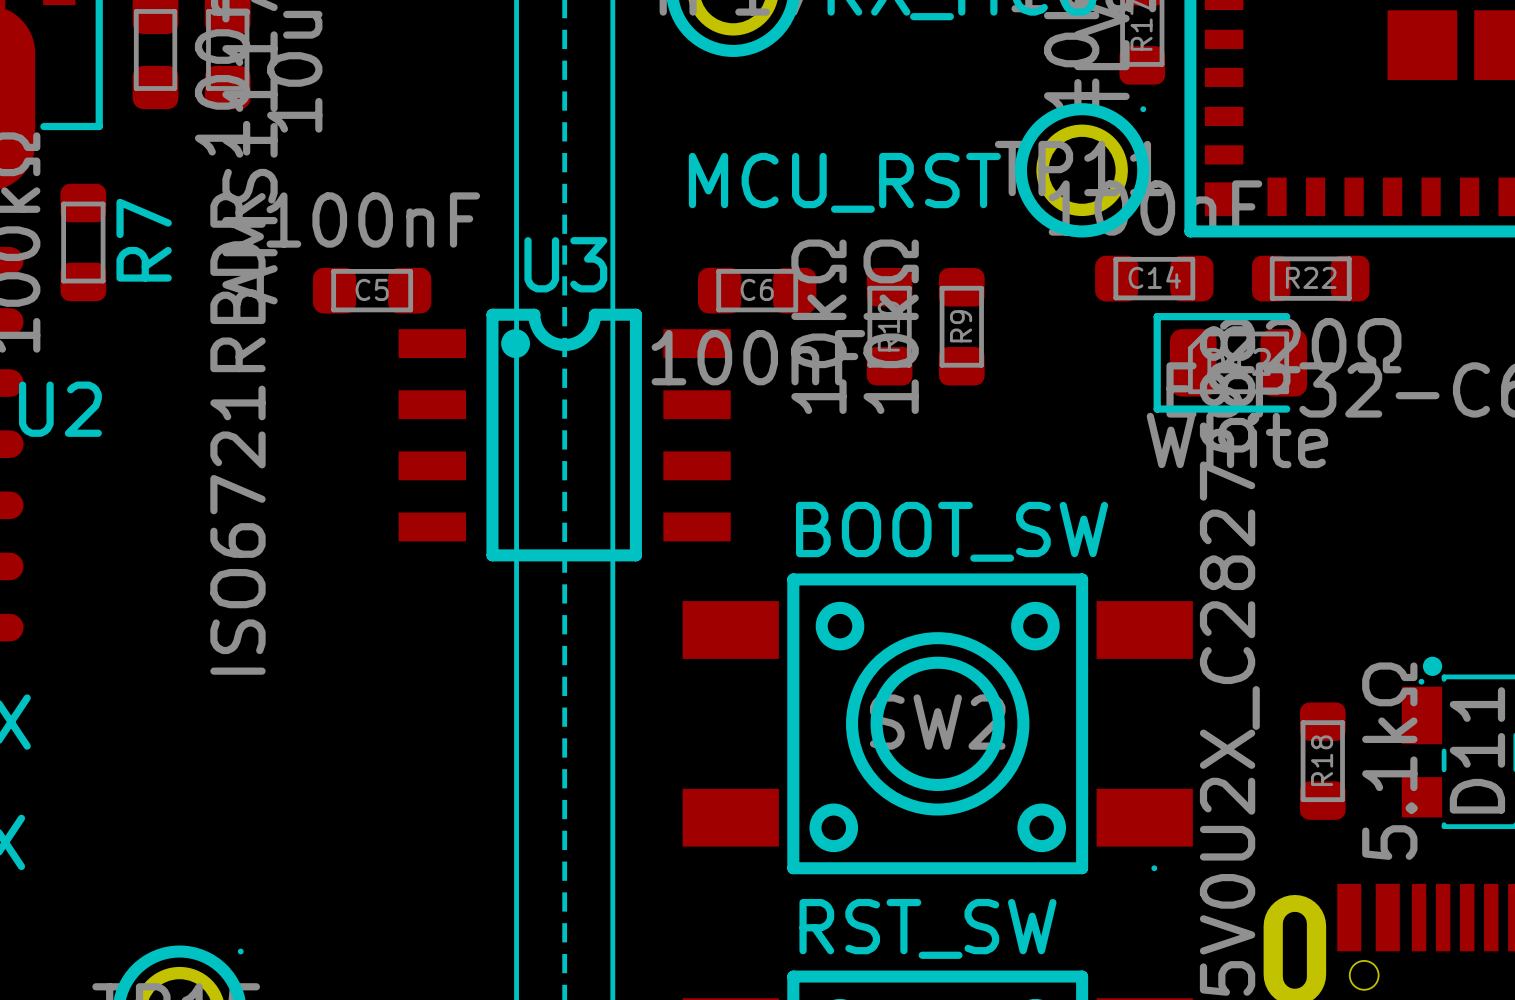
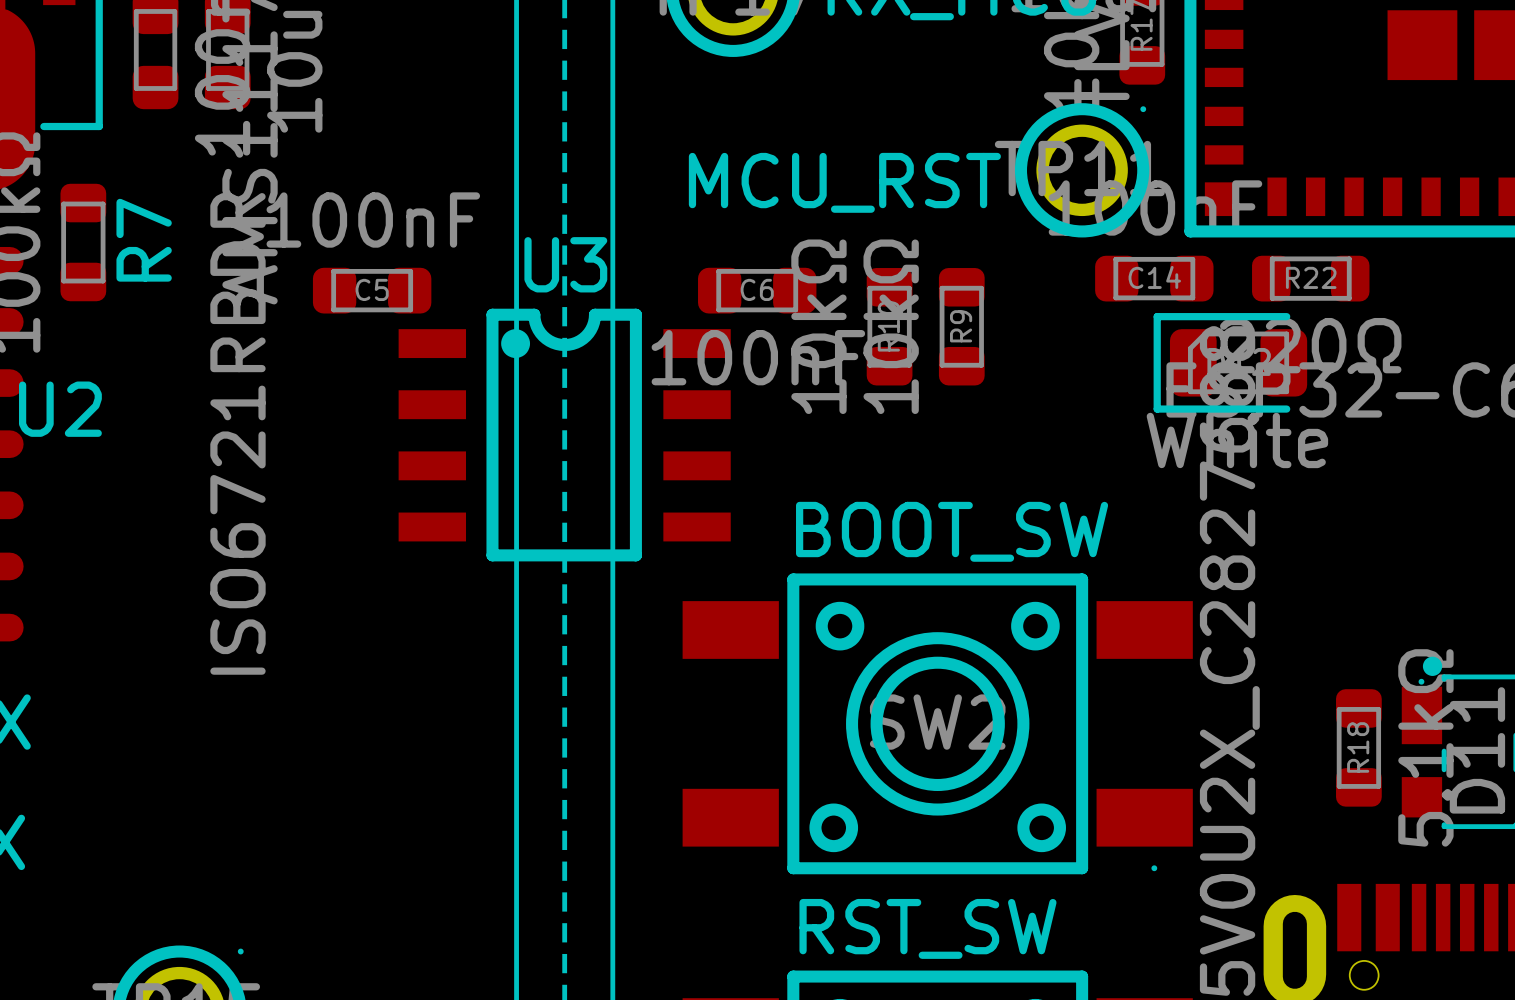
R18 position: (1322, 761) -> (1358, 747)

